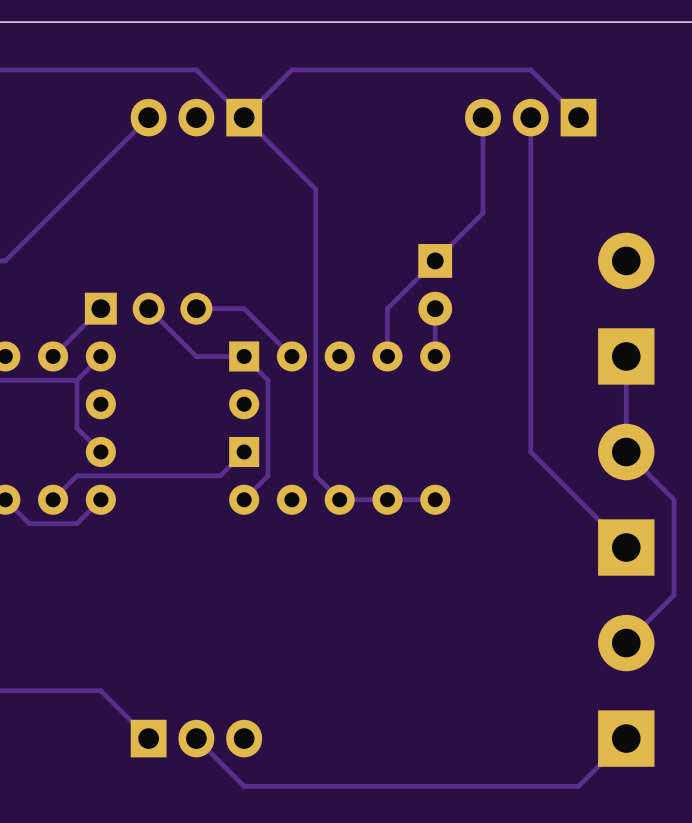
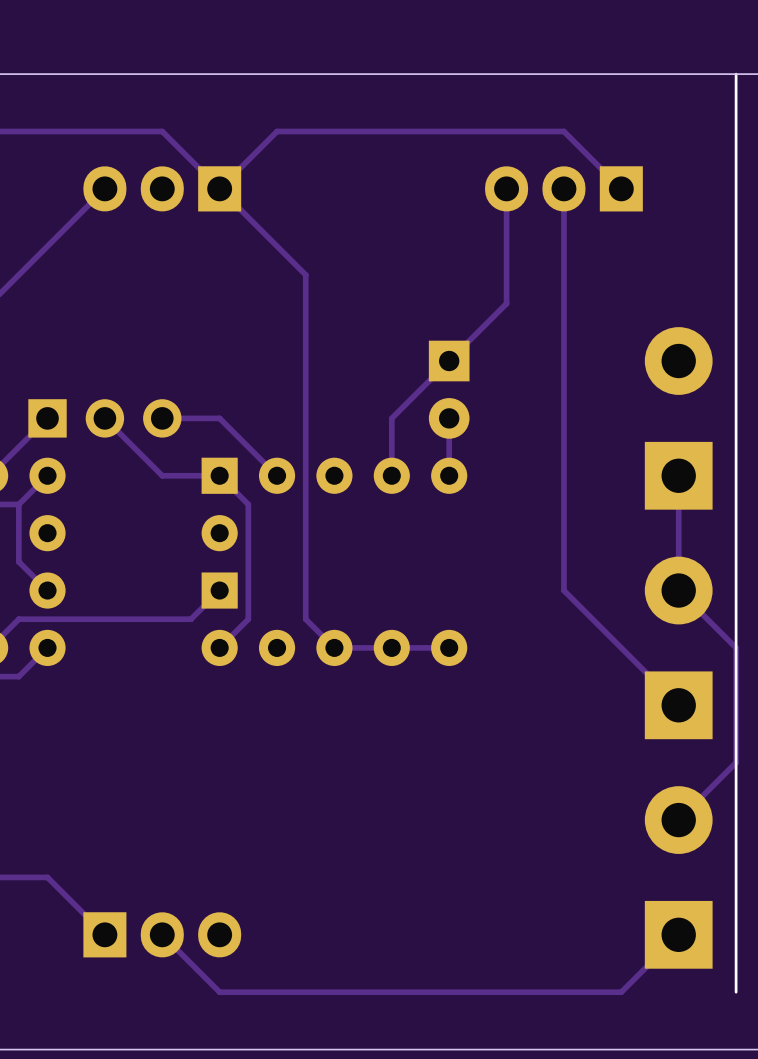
line: none -> (736, 74) (736, 992)

